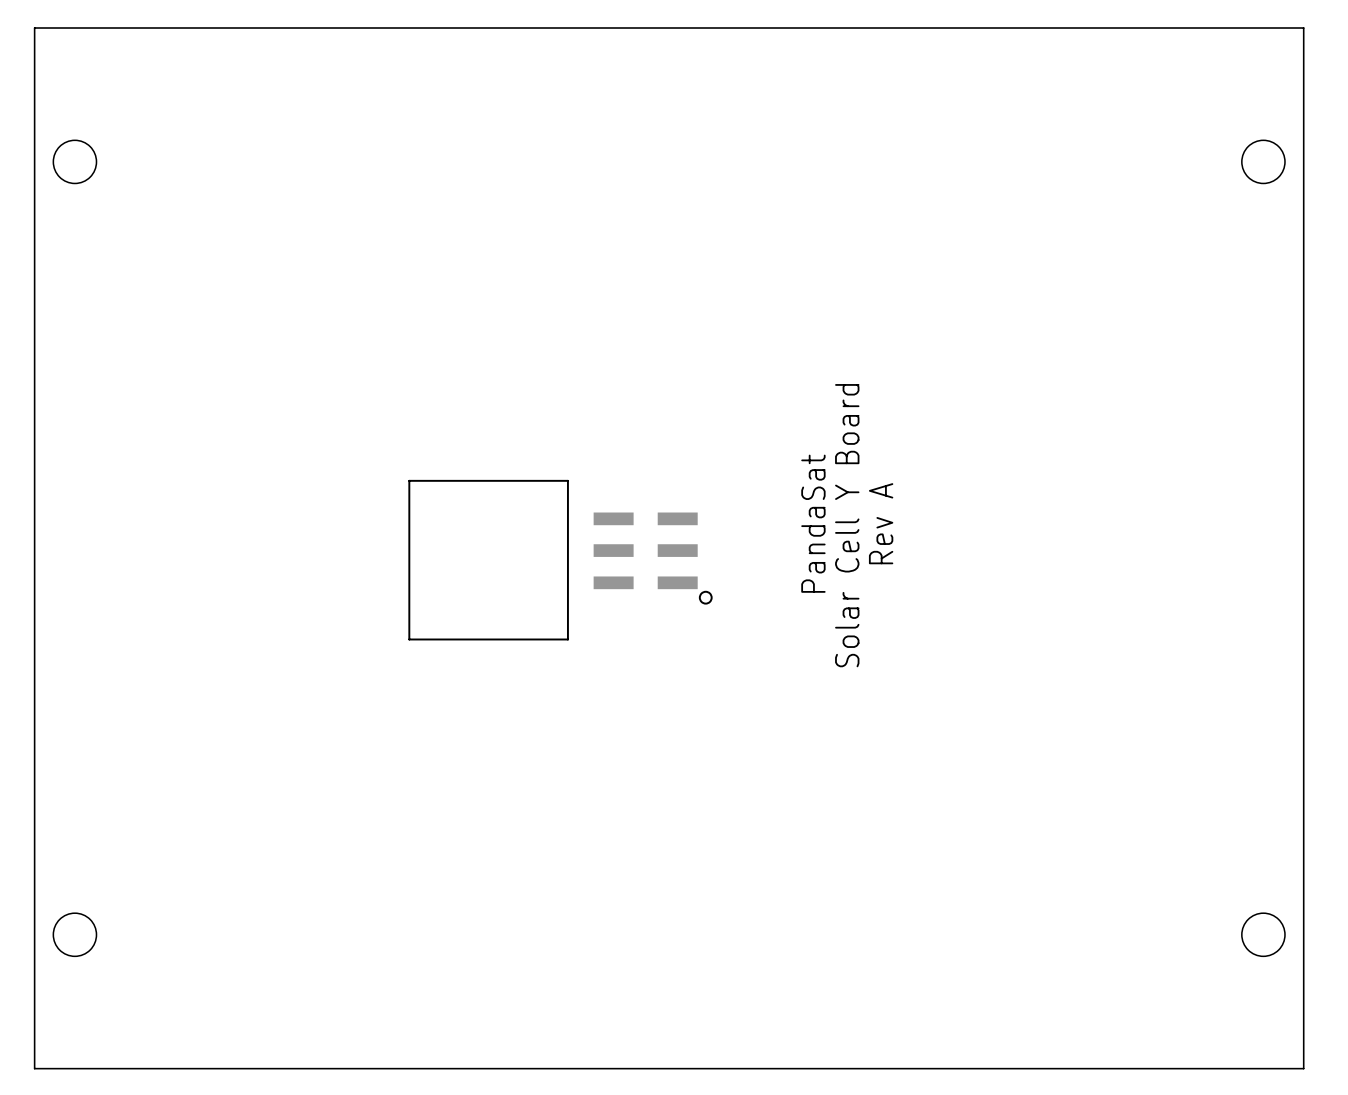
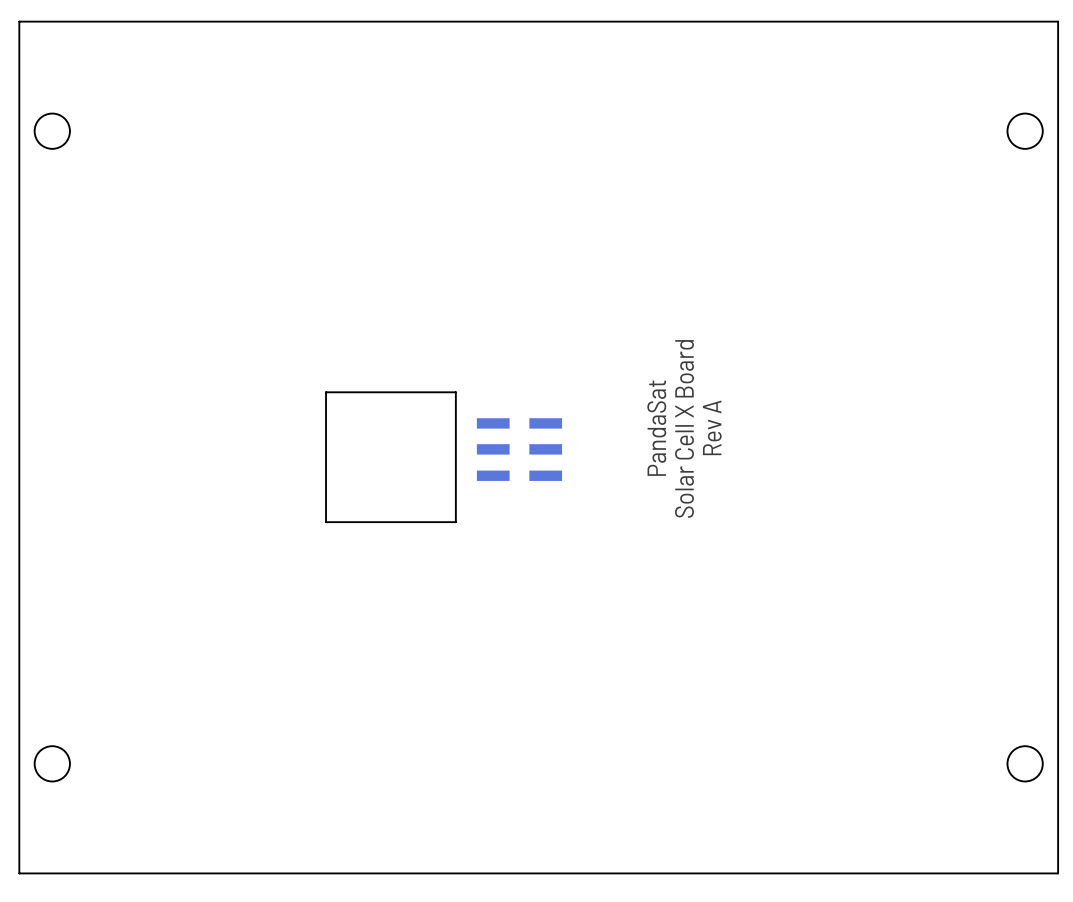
text: Solar Cell Y Board (847, 525) -> Solar Cell X Board (684, 428)
drawing: [698, 590, 713, 605] -> none

